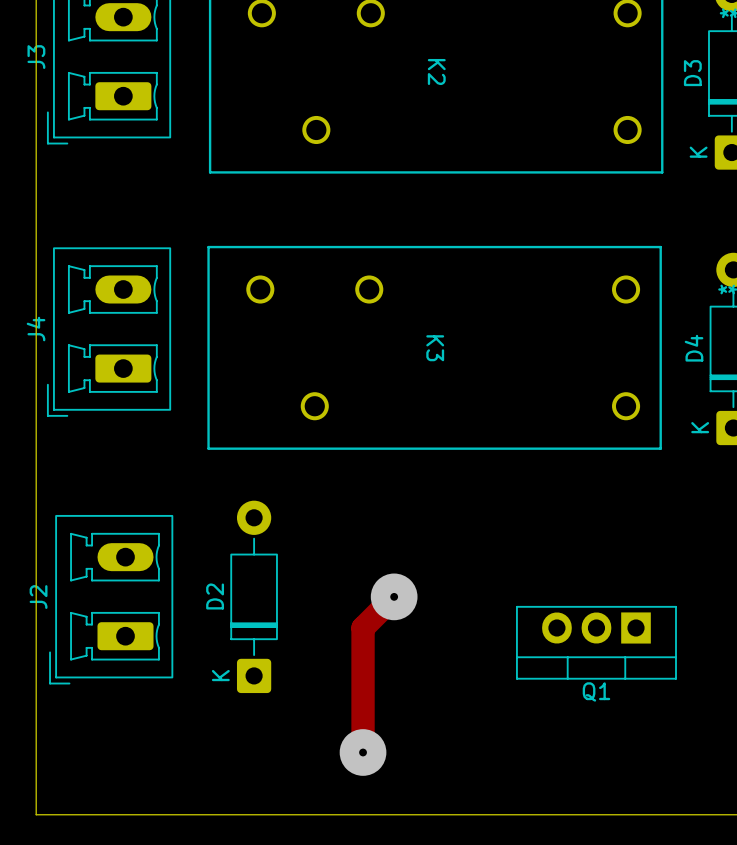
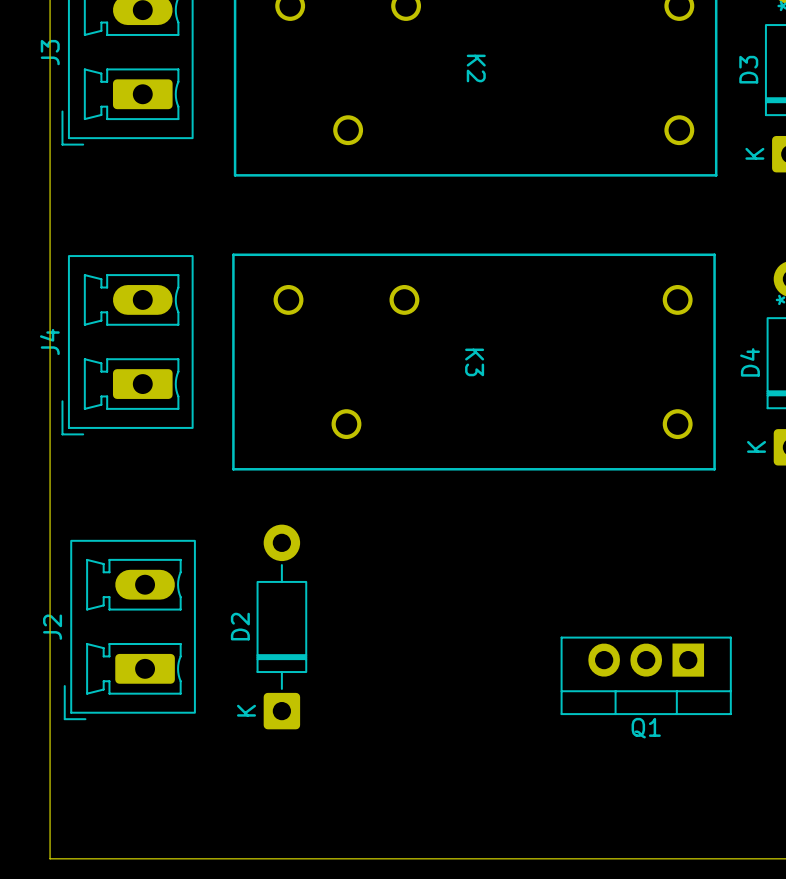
track: (394, 596) (363, 627) (363, 752) -> none
via: (394, 596) -> none
via: (363, 752) -> none

